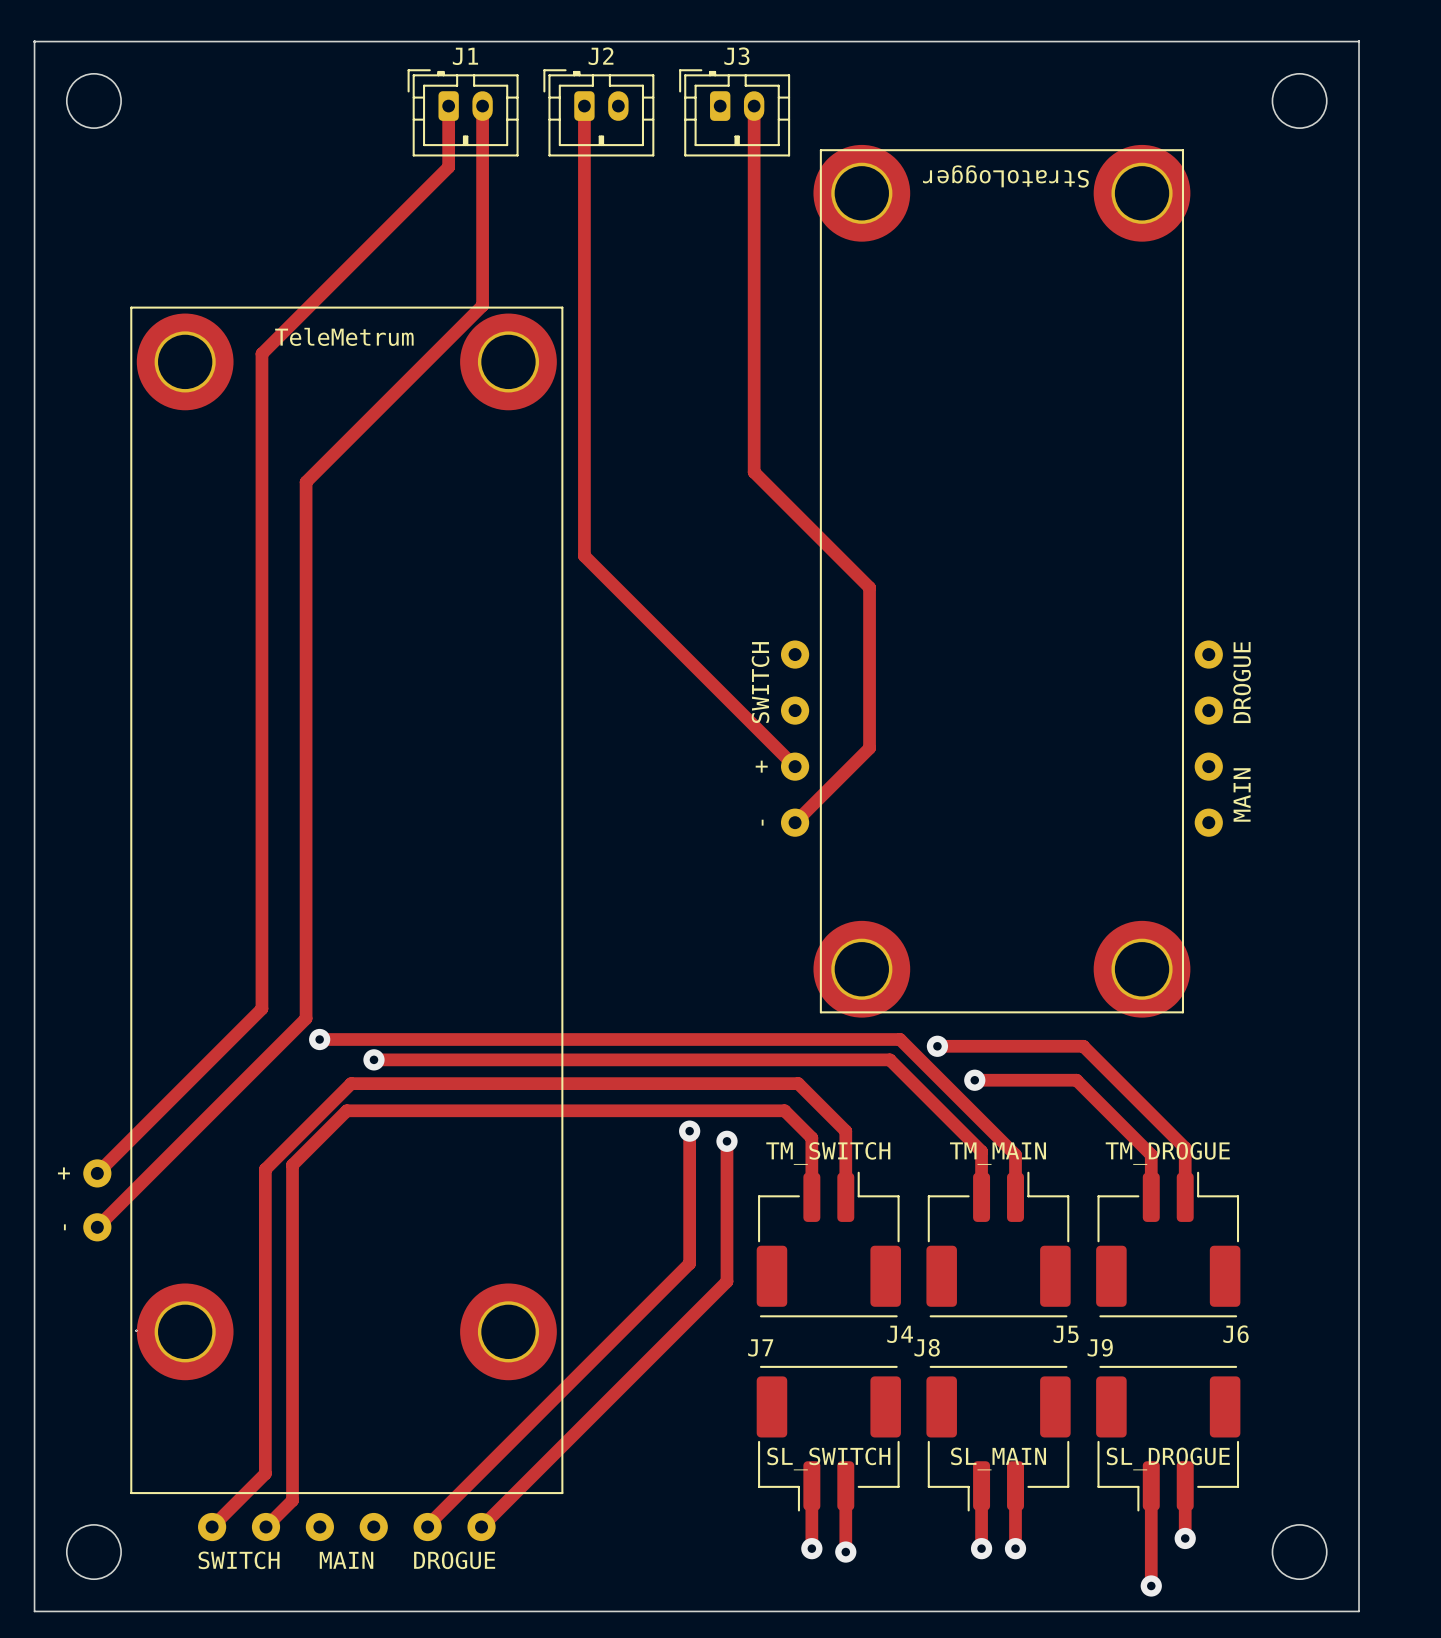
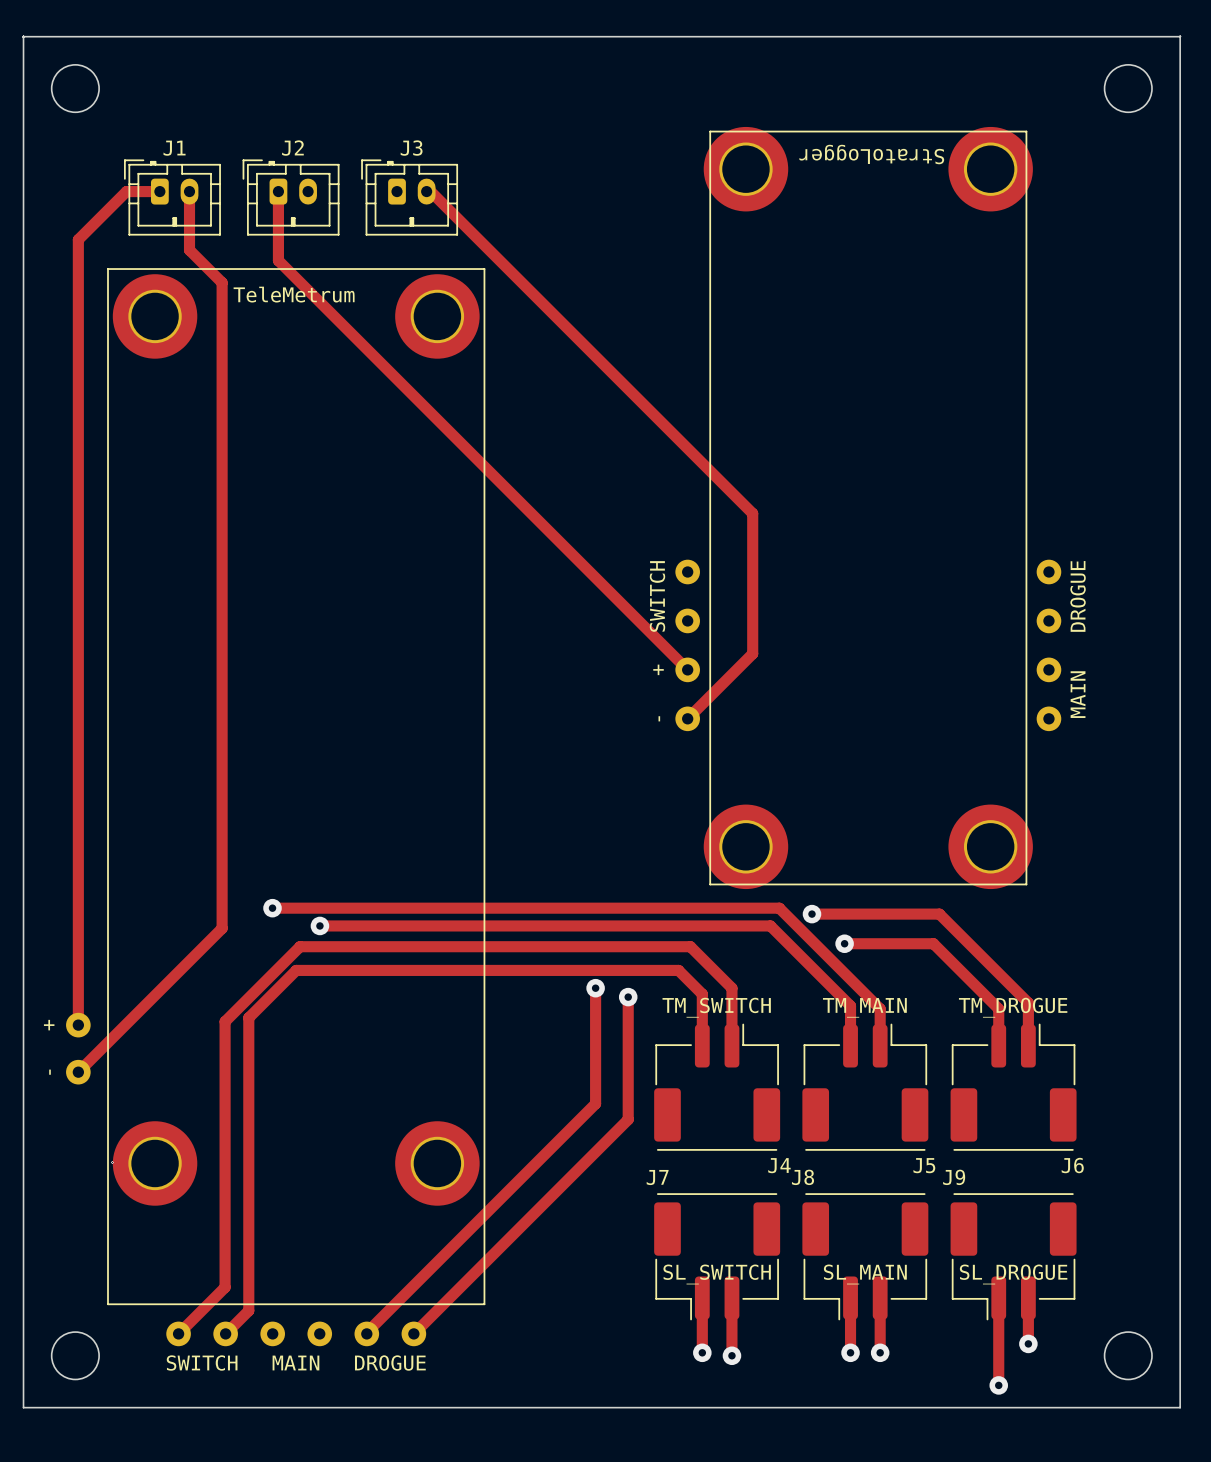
track: (754, 101) (754, 472) -> (426, 187) (651, 412)
track: (448, 106) (448, 167) (261, 353) -> (189, 191) (189, 250) (222, 282) (222, 309)
track: (482, 106) (482, 305) (306, 482) (306, 1018) (261, 1062) -> none
track: (584, 106) (584, 555) -> (278, 191) (278, 260) (503, 485)
J1 position: (463, 112) -> (172, 197)
J2 position: (598, 112) -> (291, 197)
J3 position: (734, 112) -> (409, 197)
track: none -> (159, 191) (126, 191) (78, 239) (78, 1025)
track: (261, 1008) (97, 1173) -> (222, 881) (222, 928)

